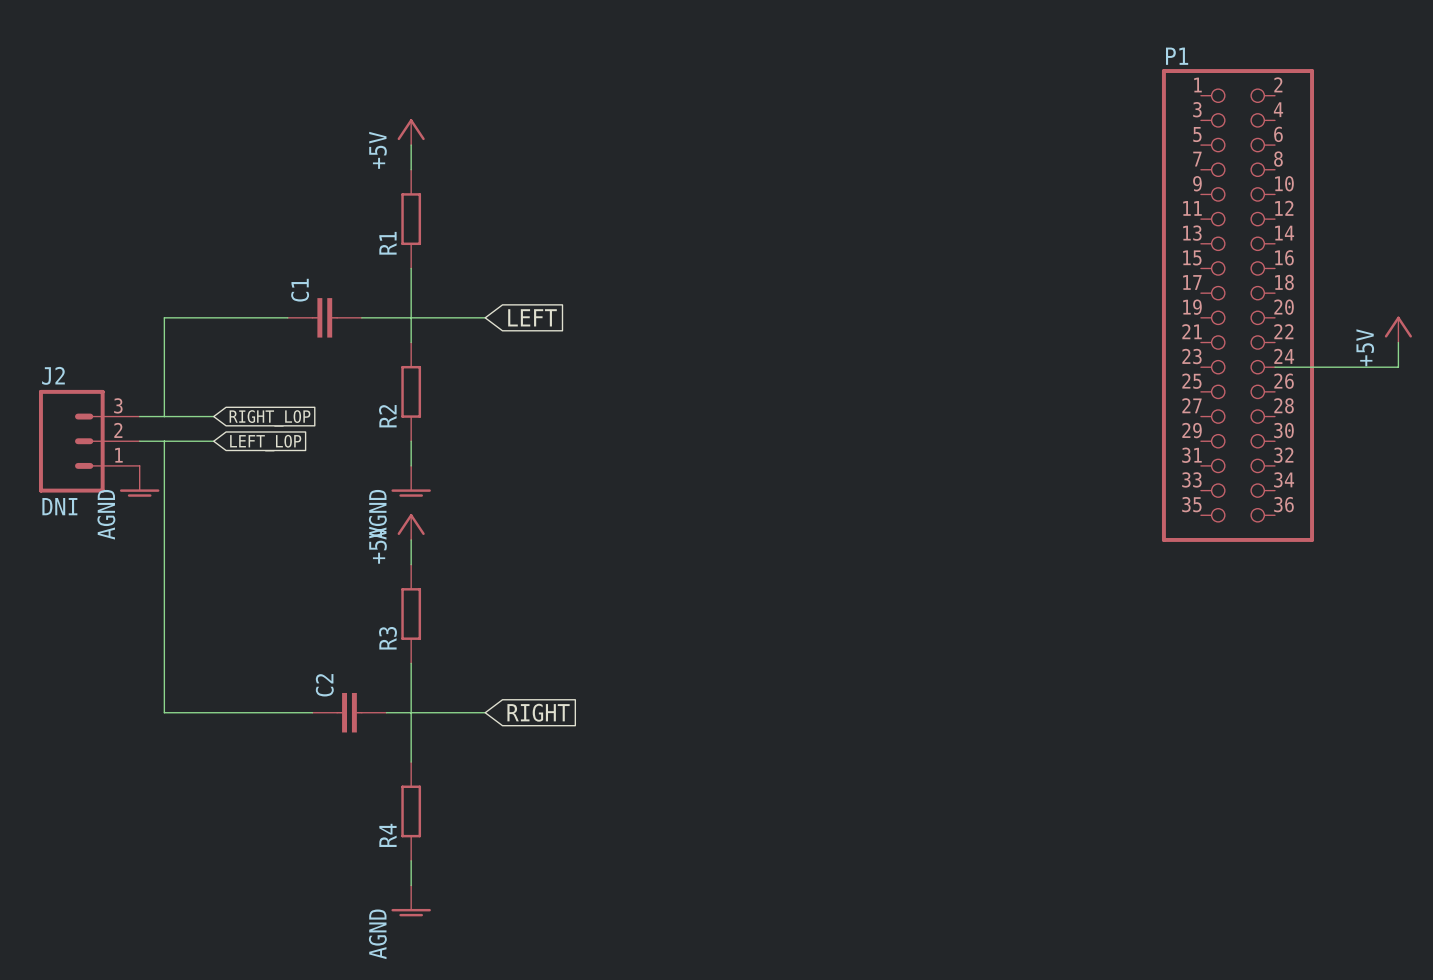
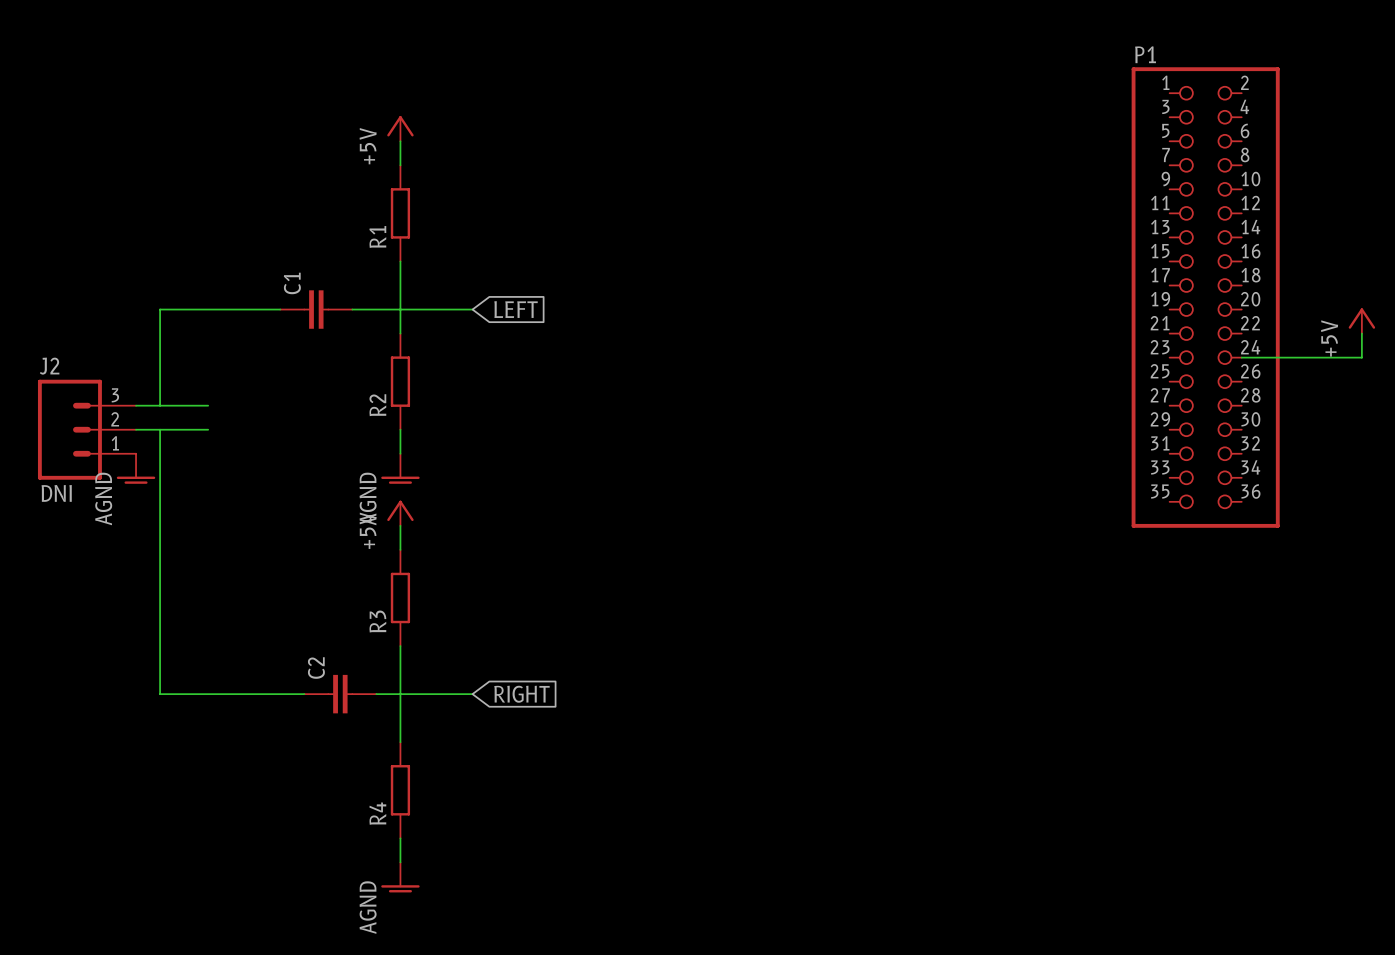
global label: RIGHT_LOP (269, 418) -> none
global label: LEFT_LOP (265, 443) -> none

